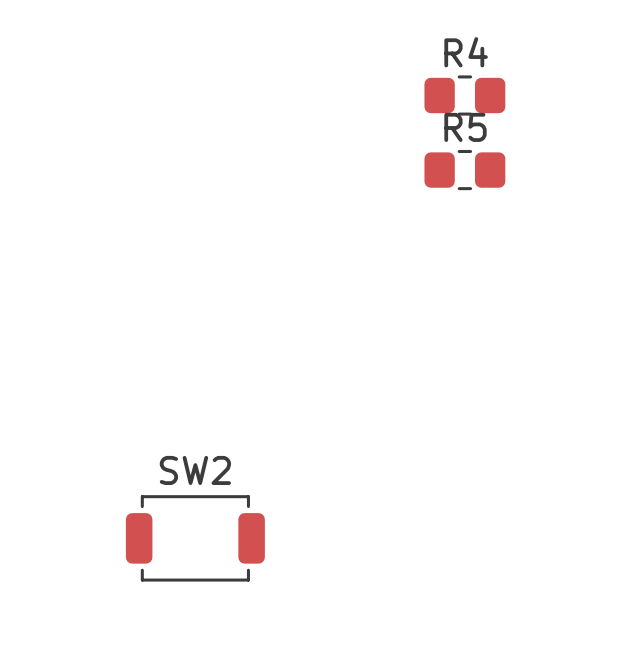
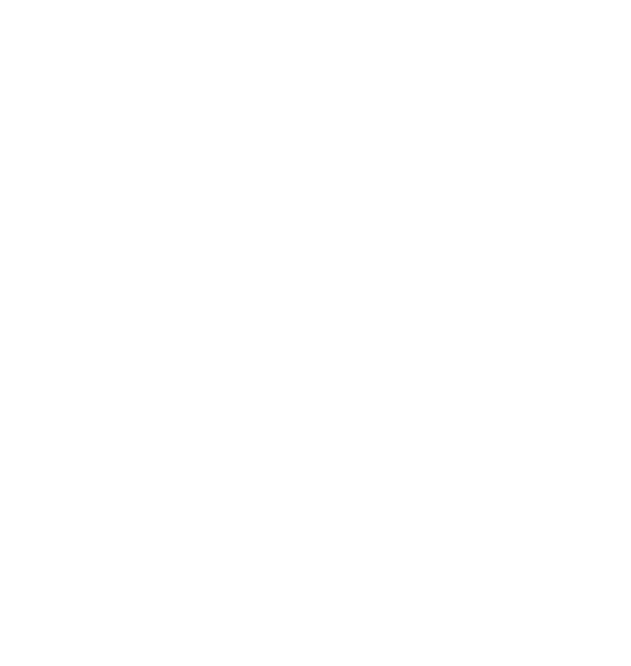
R4: (464, 95) -> none
R5: (464, 170) -> none
SW2: (195, 538) -> none

